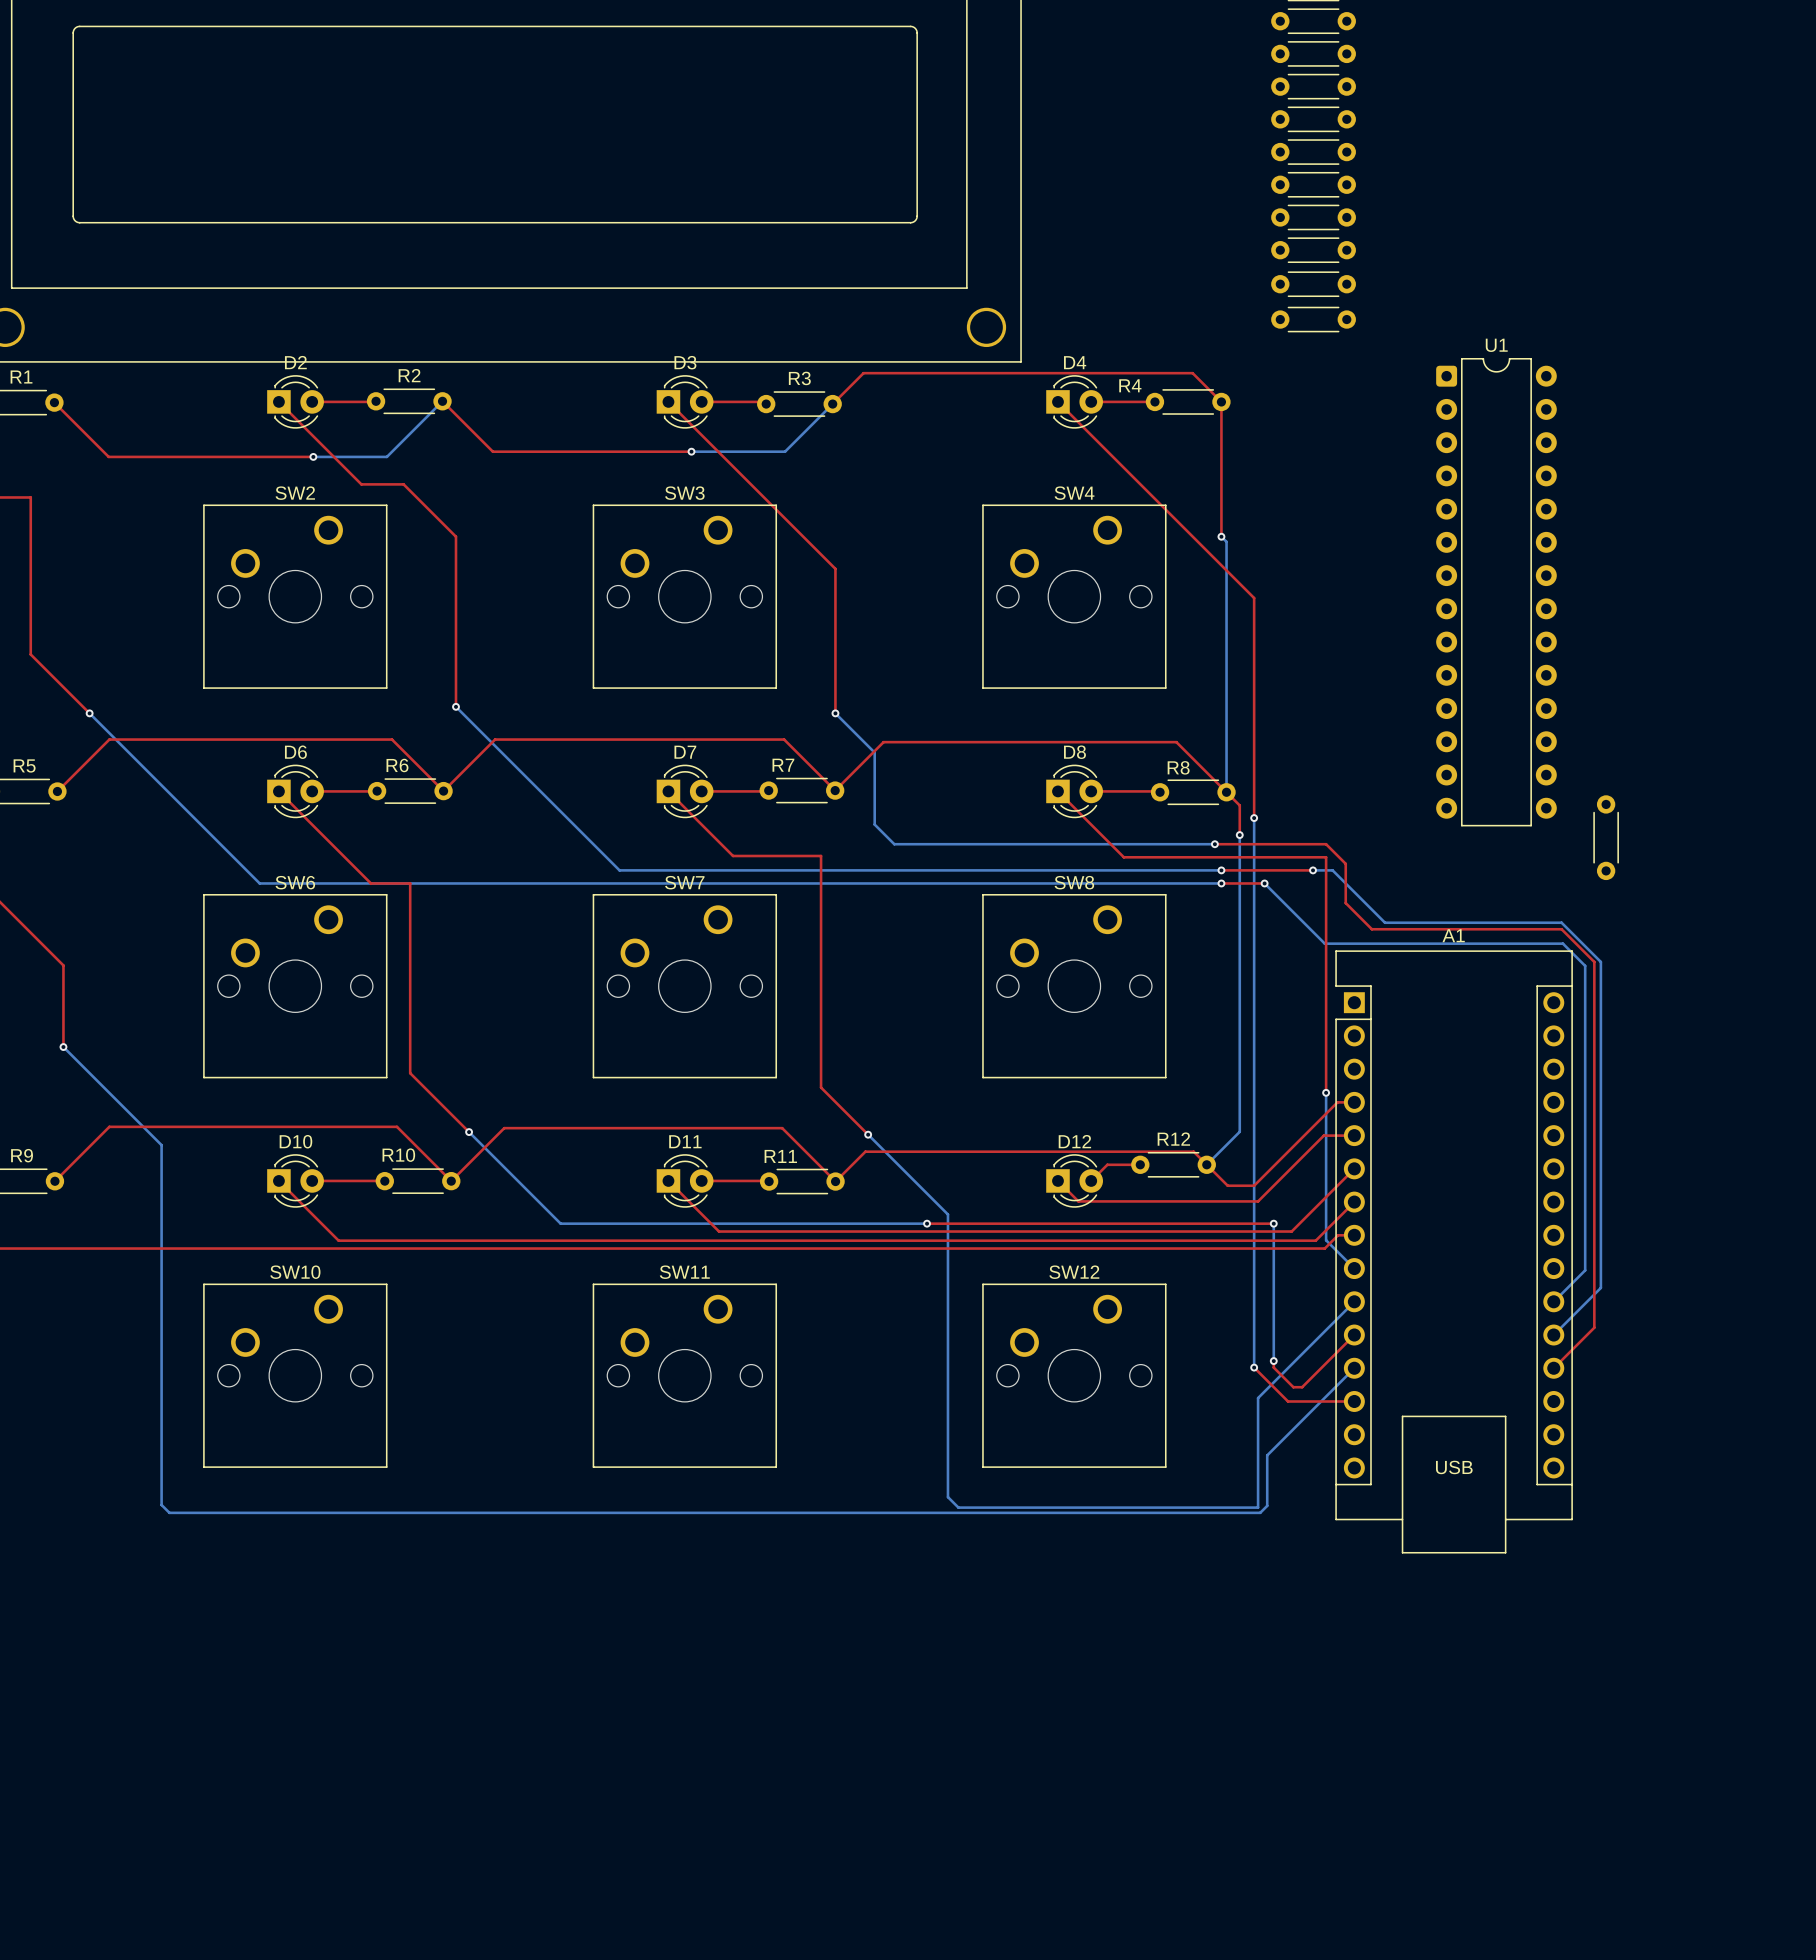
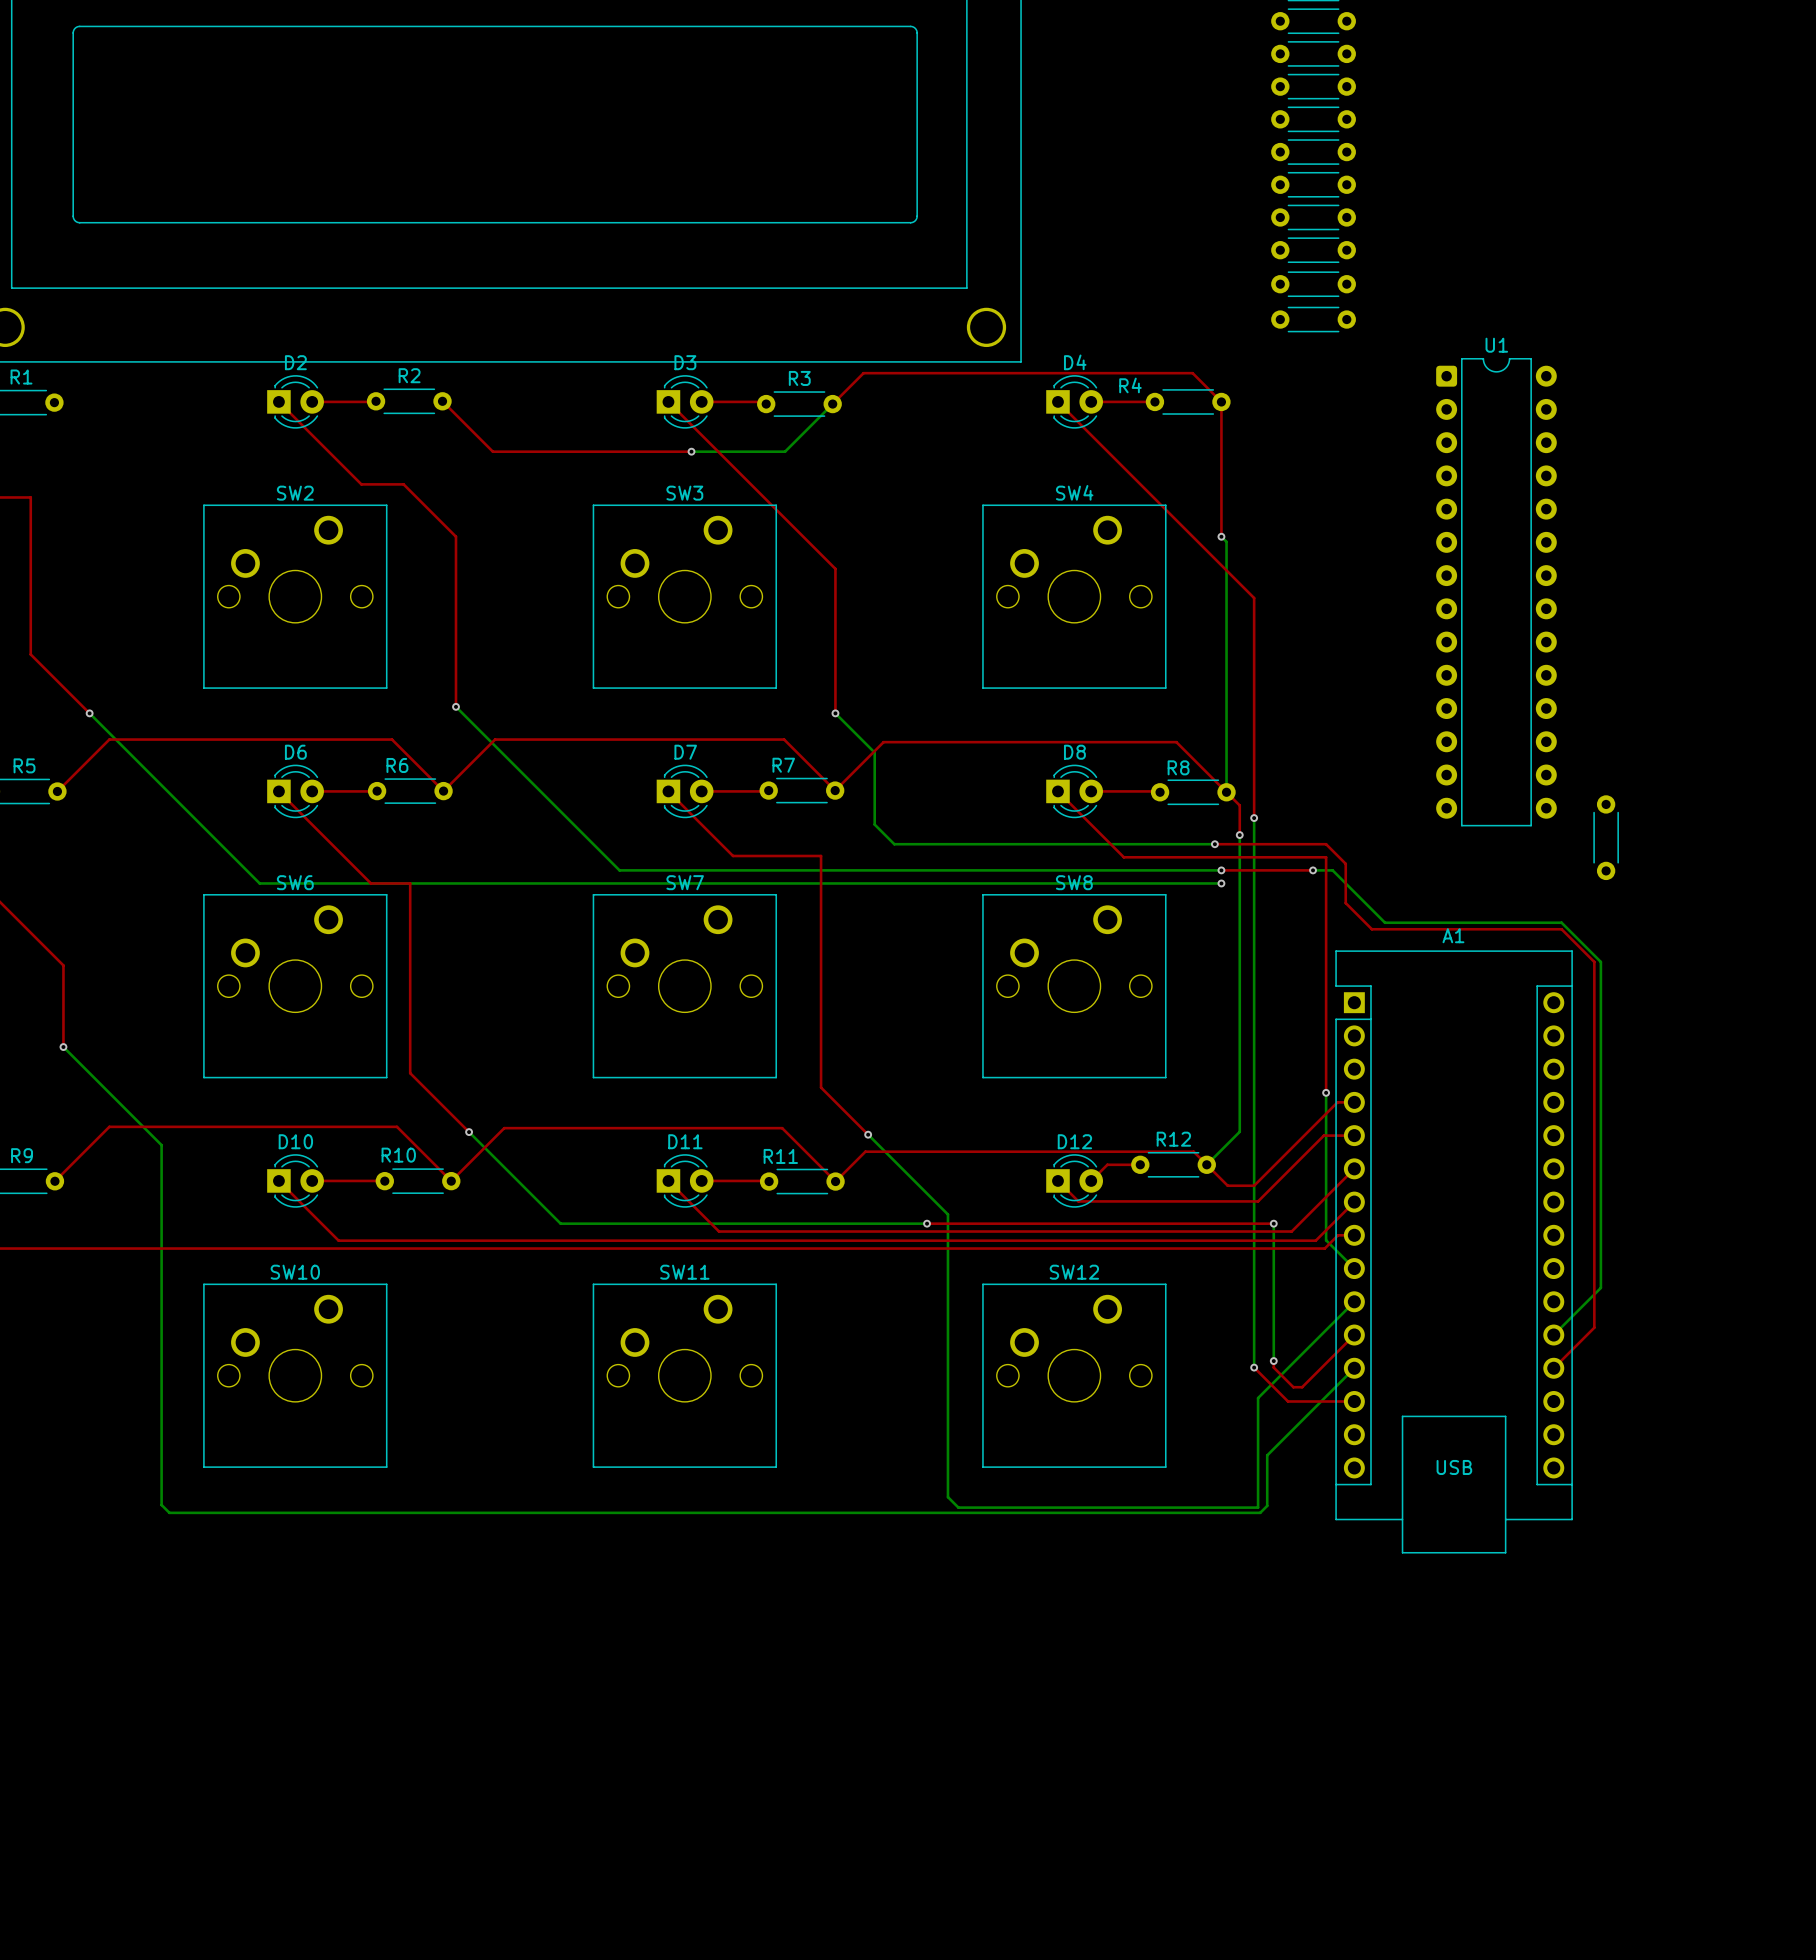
bottom track: (442, 401) (386, 456) (313, 456) -> none
top track: (54, 402) (108, 456) (313, 456) -> none
via: (313, 456) -> none
top track: (1221, 883) (1264, 883) -> none
bottom track: (1264, 883) (1324, 943) (1562, 943) (1585, 965) (1585, 1270) (1553, 1301) -> none
via: (1264, 883) -> none

